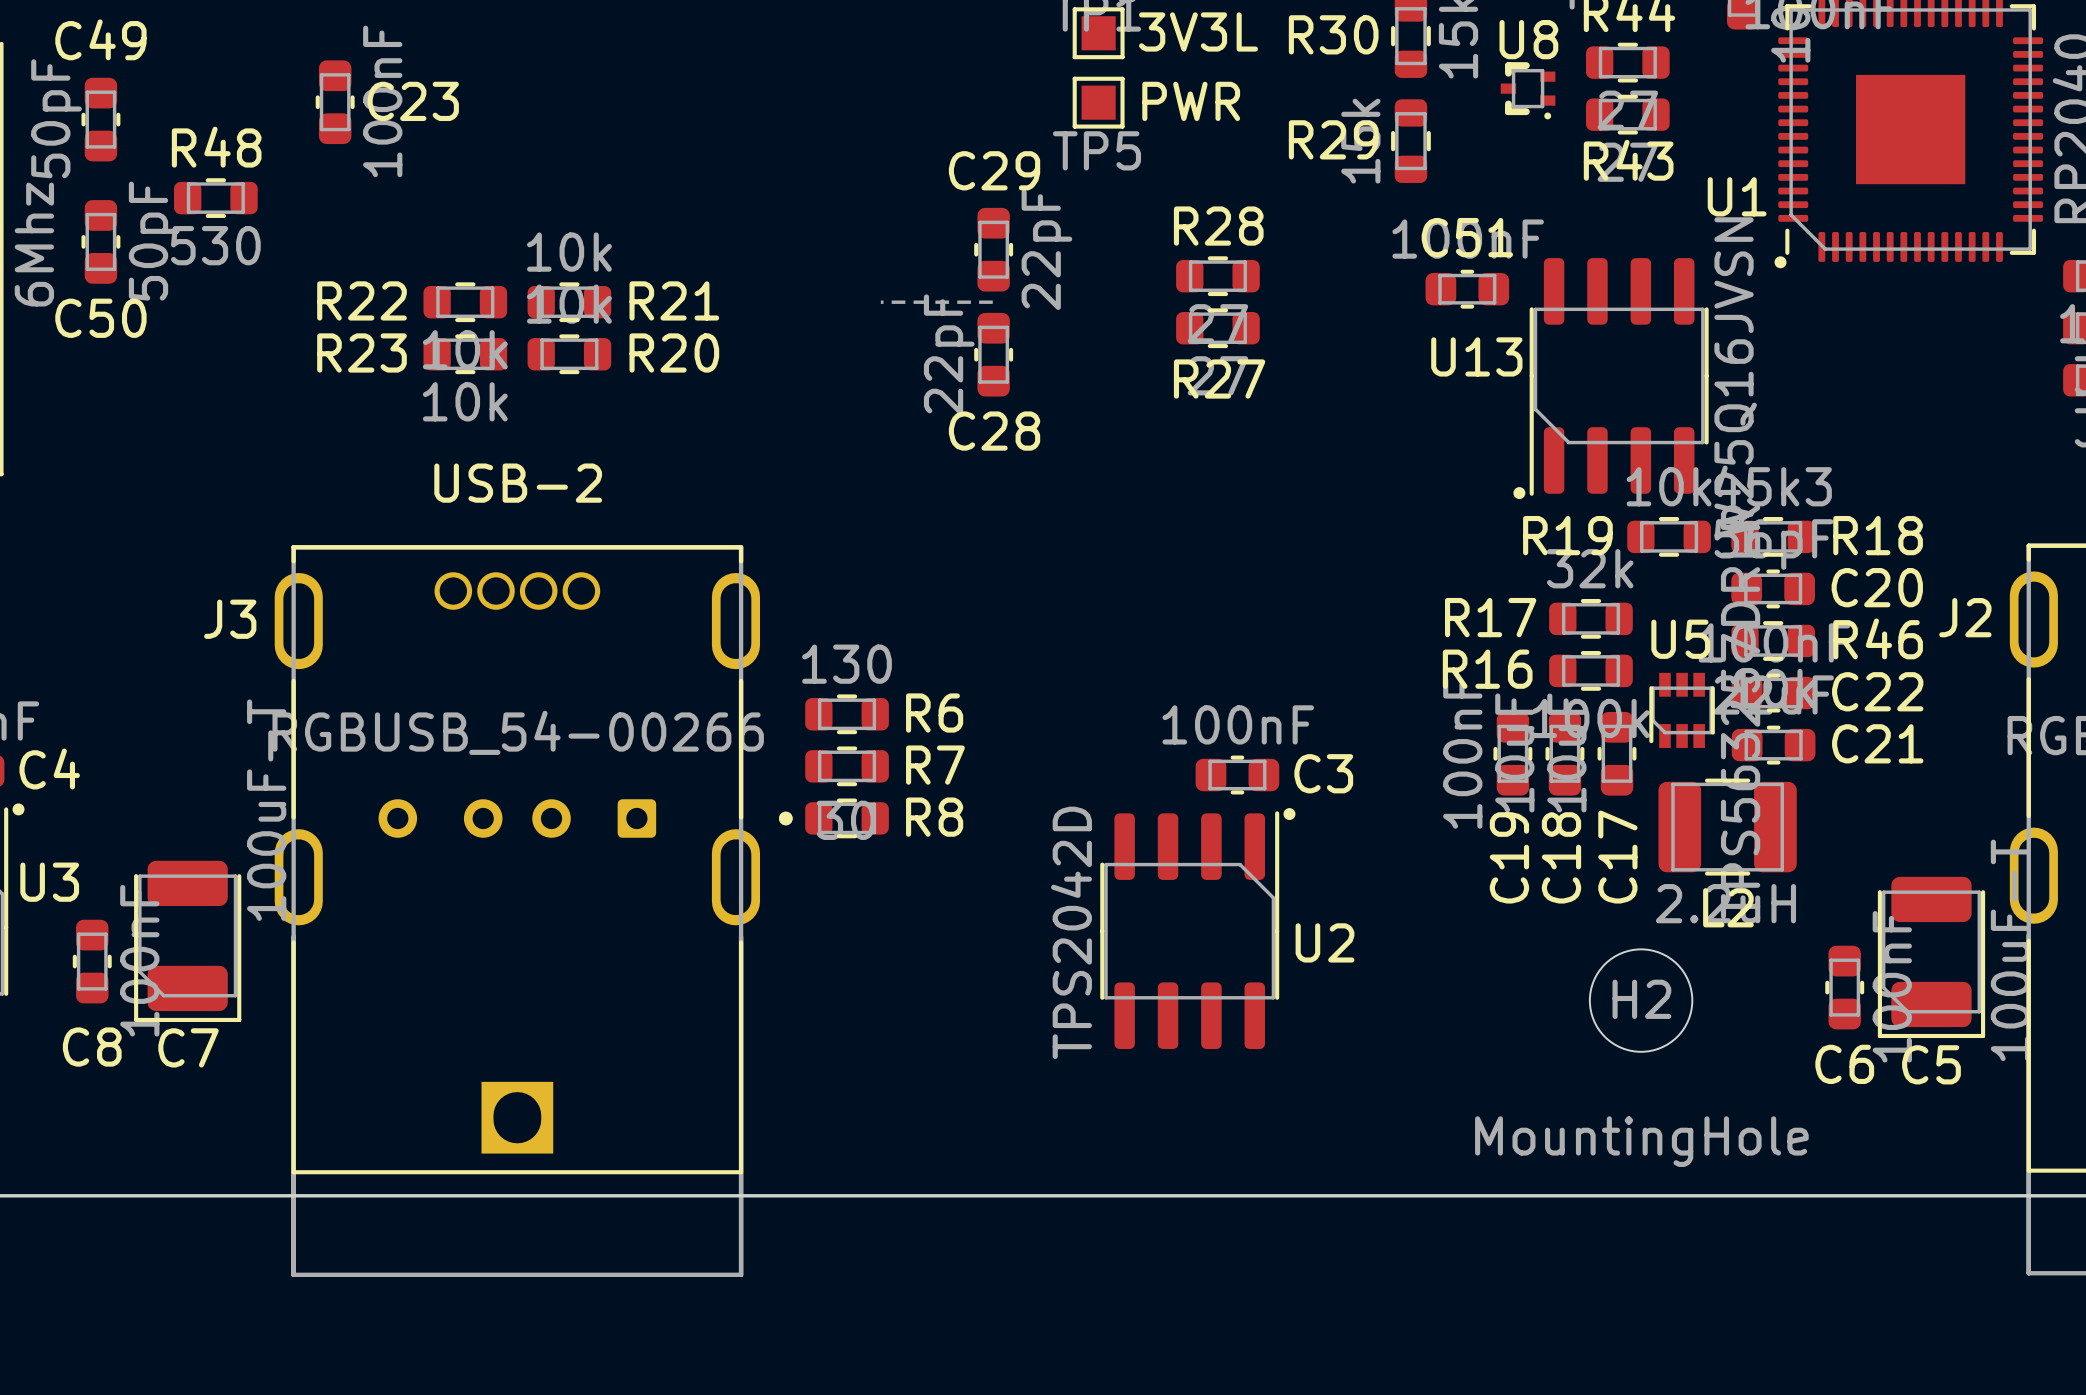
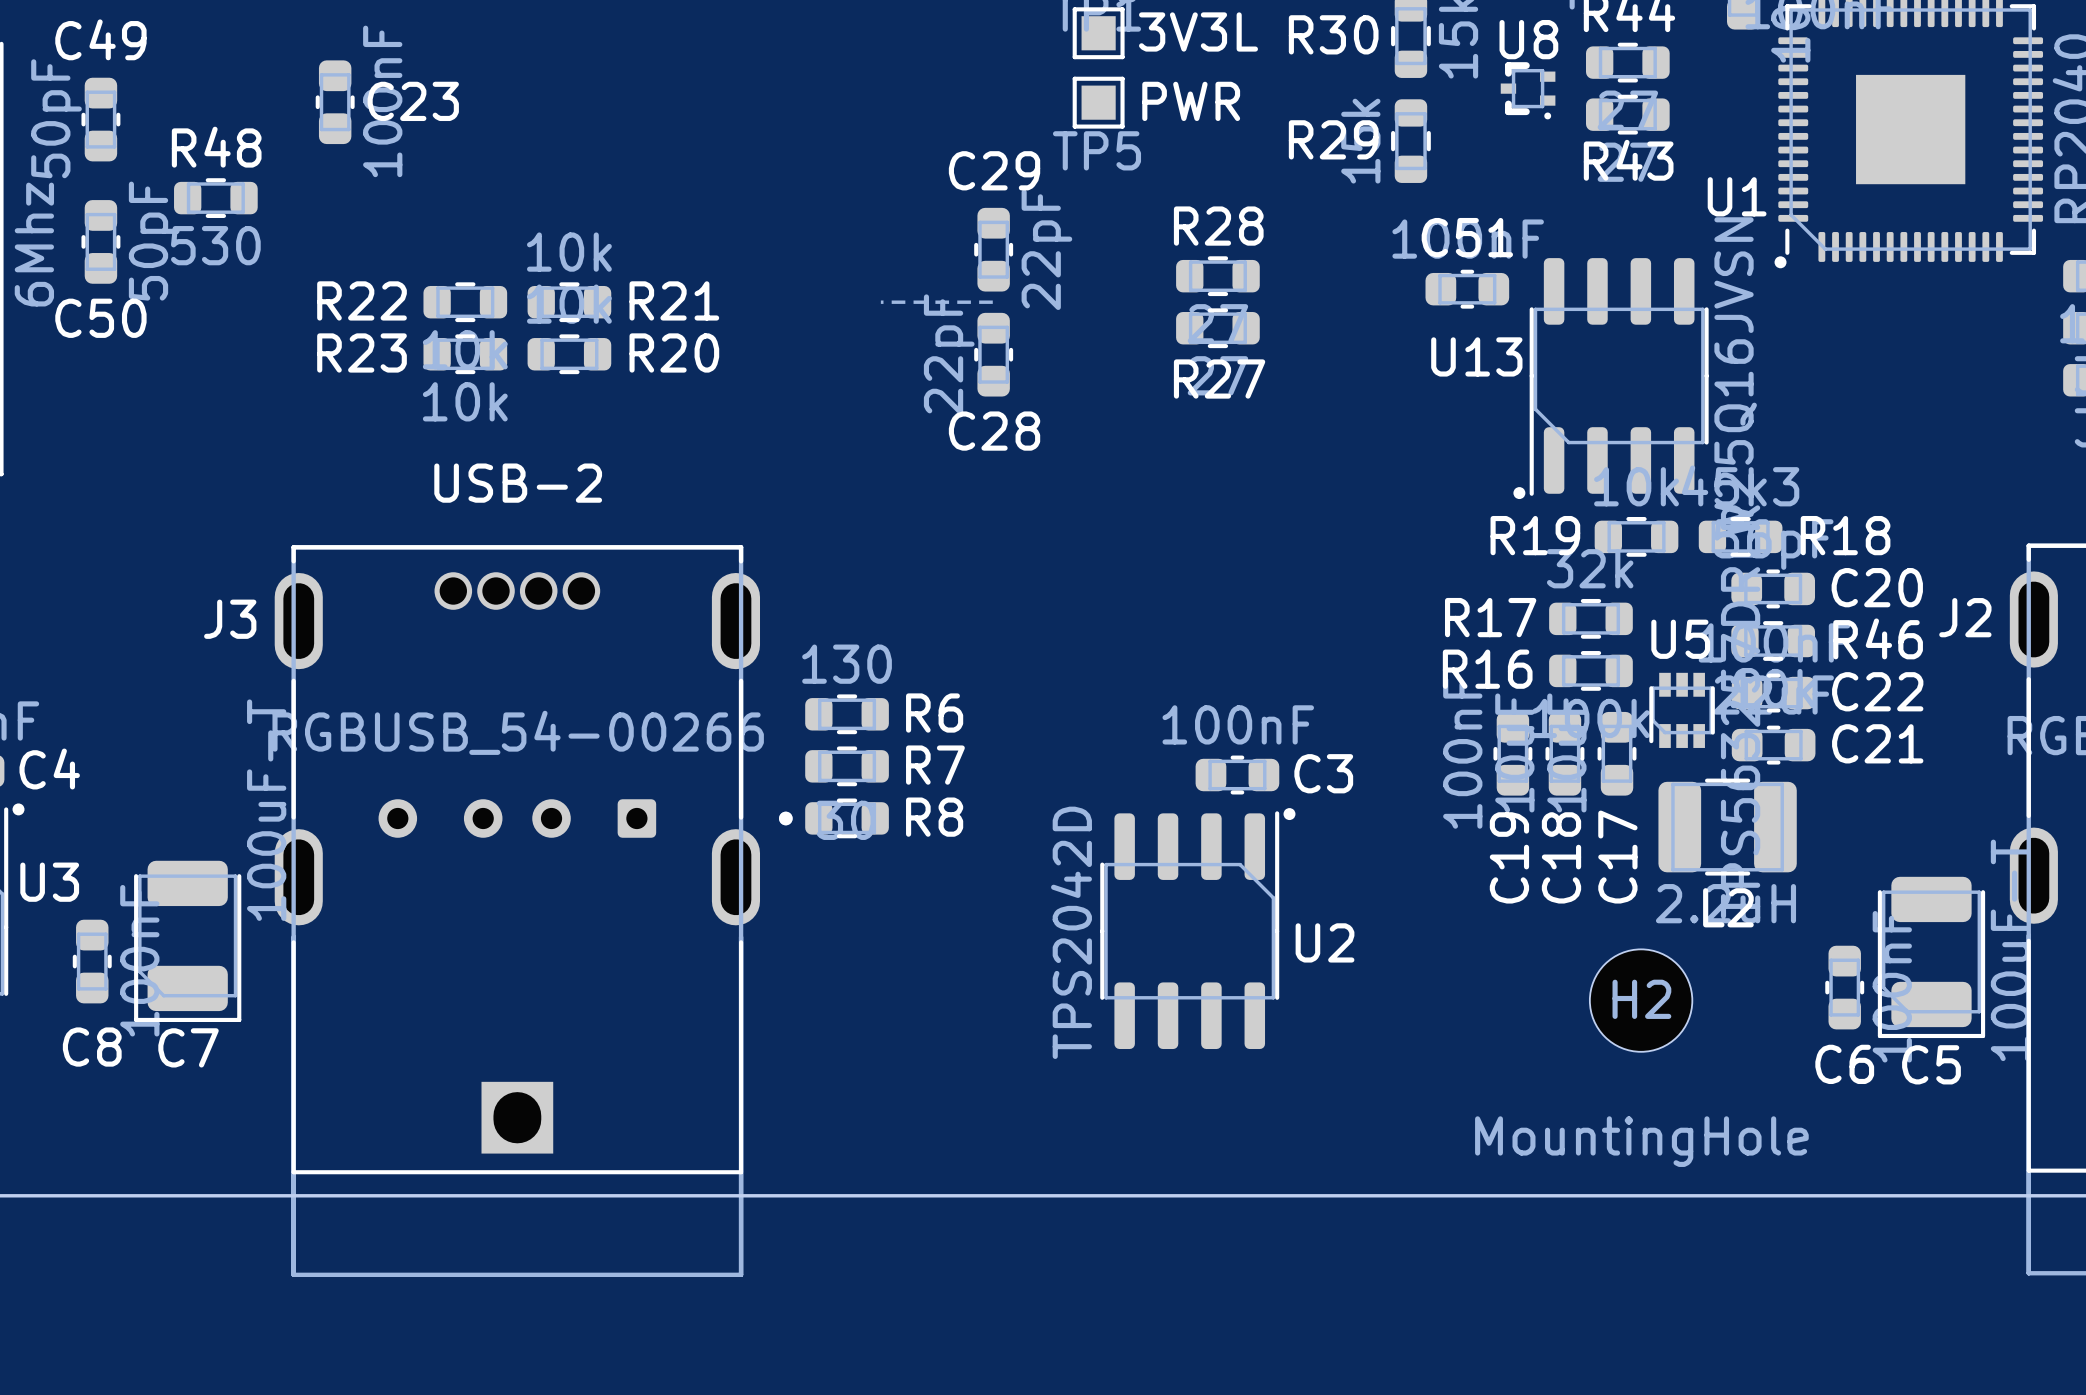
R19 position: (1669, 536) -> (1636, 536)
R18 position: (1773, 536) -> (1740, 536)

